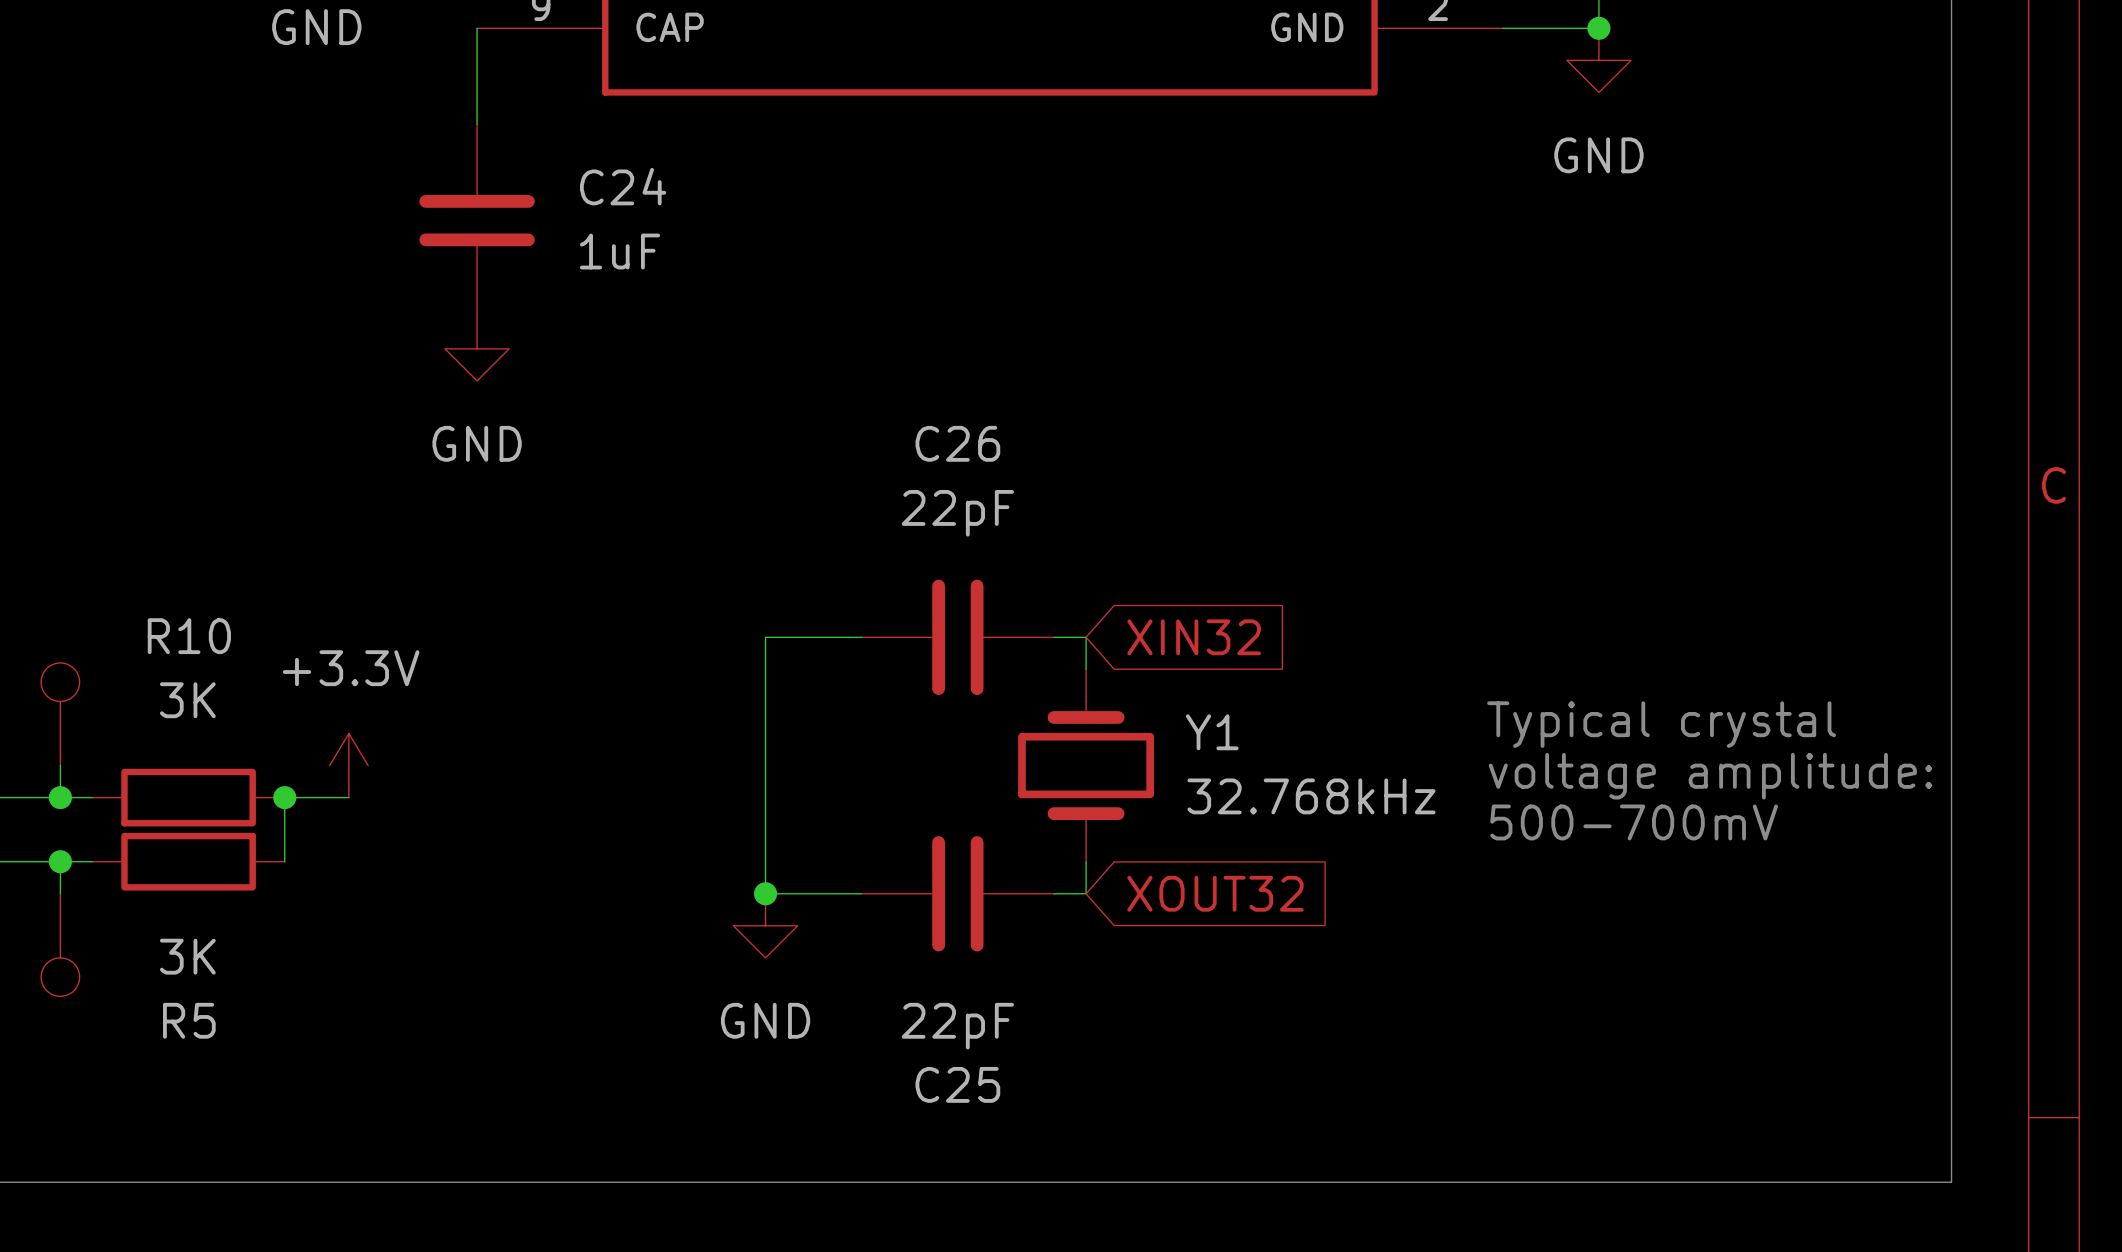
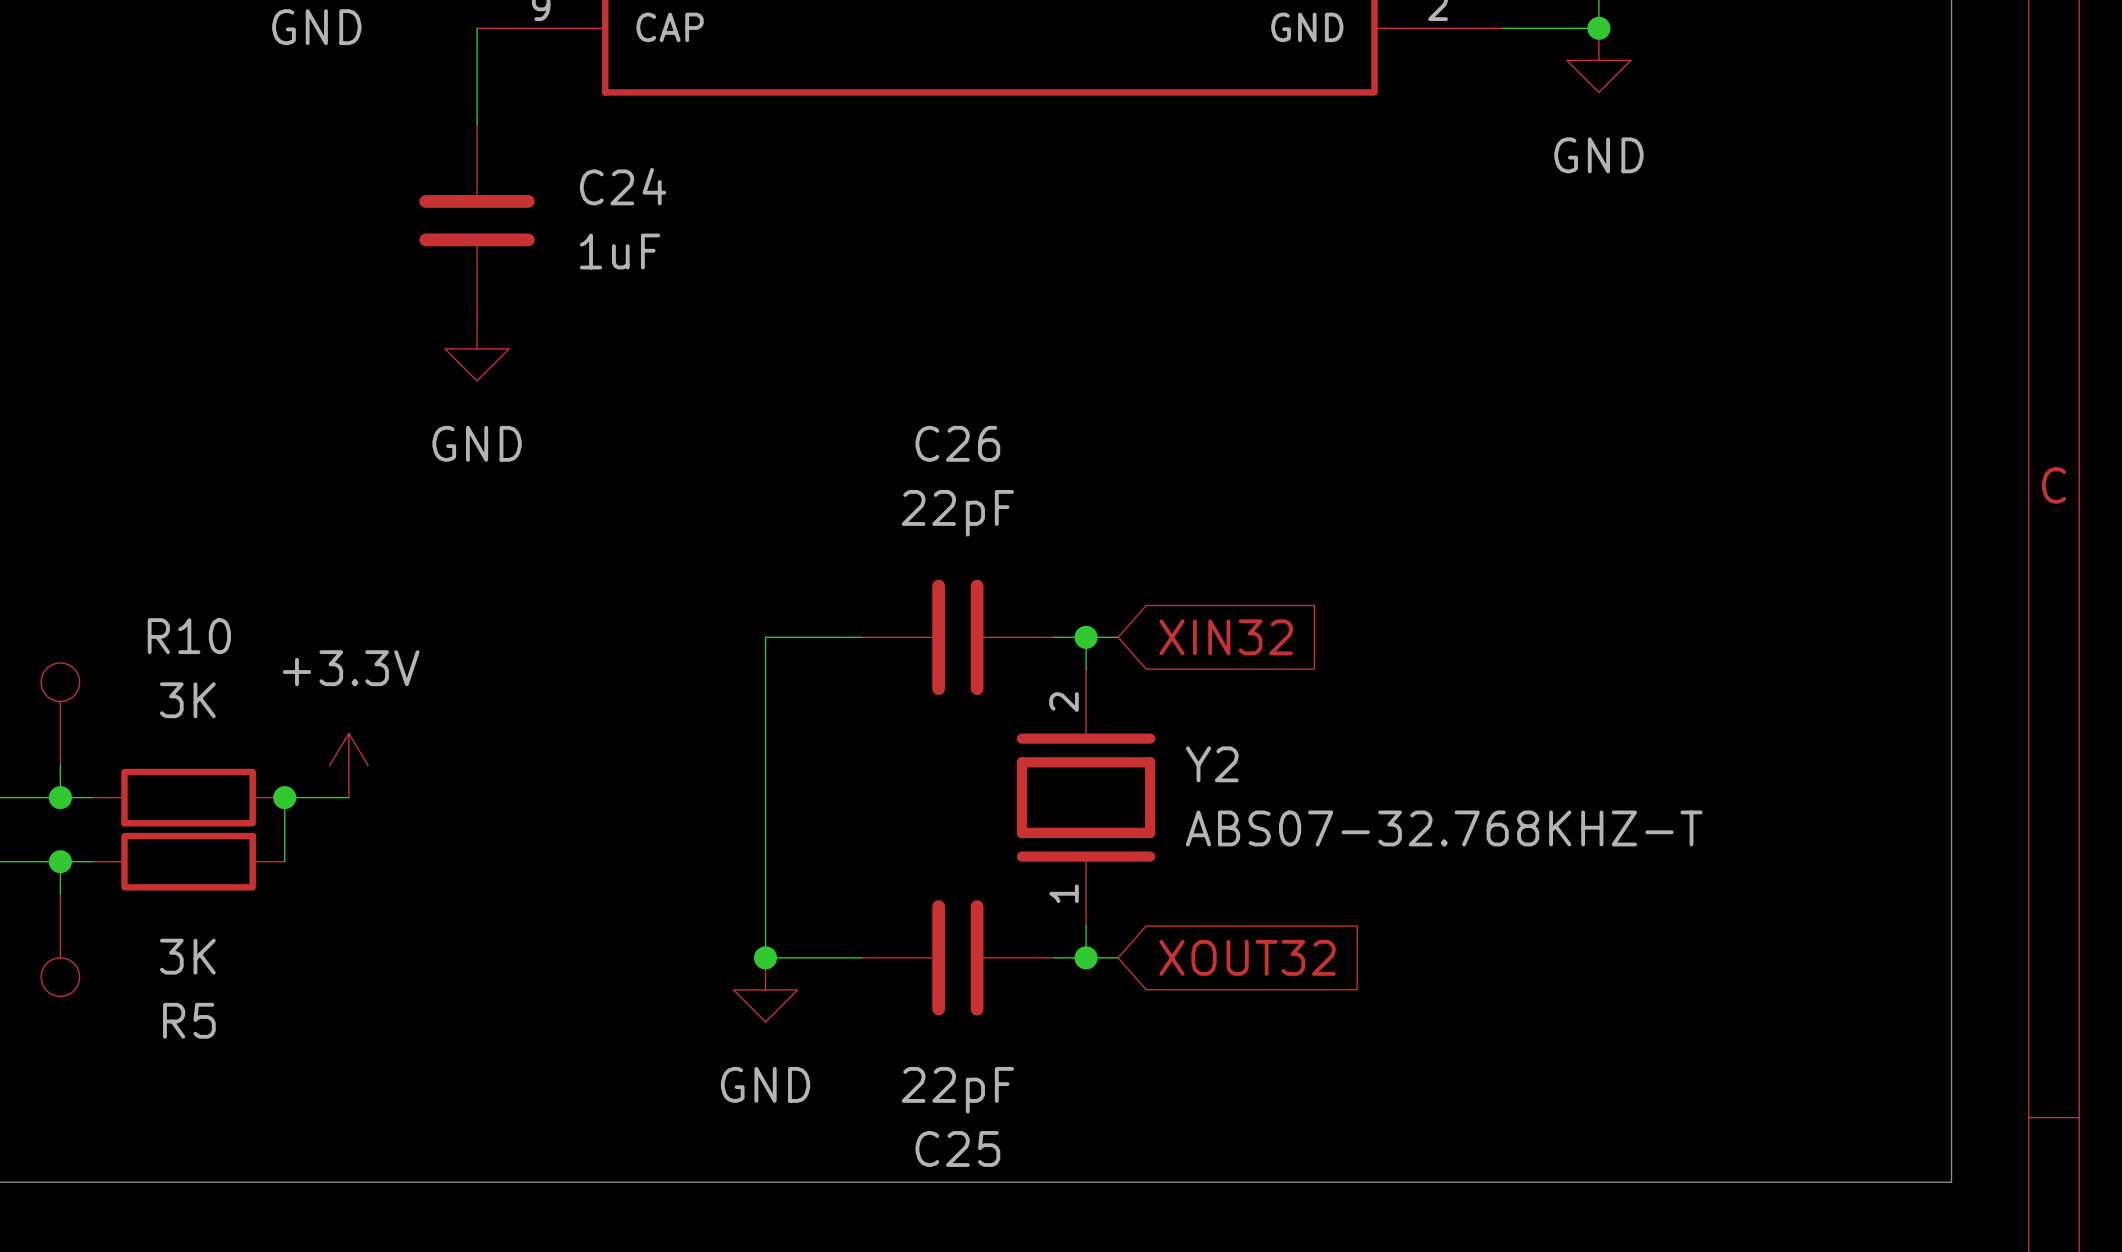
wire: none -> (1086, 637) (1118, 637)
junction: none -> (1086, 637)
global label position: XIN32 (1194, 637) -> XIN32 (1226, 637)
text: Typical crystal (1661, 724) -> none
Y1: 32.768kHz (1086, 765) -> none
text: voltage amplitude: (1710, 776) -> none
Y2: none -> ABS07-32.768KHZ-T (1086, 797)
text: 500-700mV (1634, 822) -> none
wire: (765, 893) (861, 893) -> (765, 893) (765, 957) (861, 957)
junction position: (765, 893) -> (765, 957)
C25 position: (957, 893) -> (957, 957)
global label position: XOUT32 (1215, 893) -> XOUT32 (1247, 957)
power symbol position: GND (765, 925) -> GND (765, 989)
wire: none -> (1086, 925) (1086, 957)
wire: none -> (1054, 957) (1118, 957)
junction: none -> (1086, 957)

